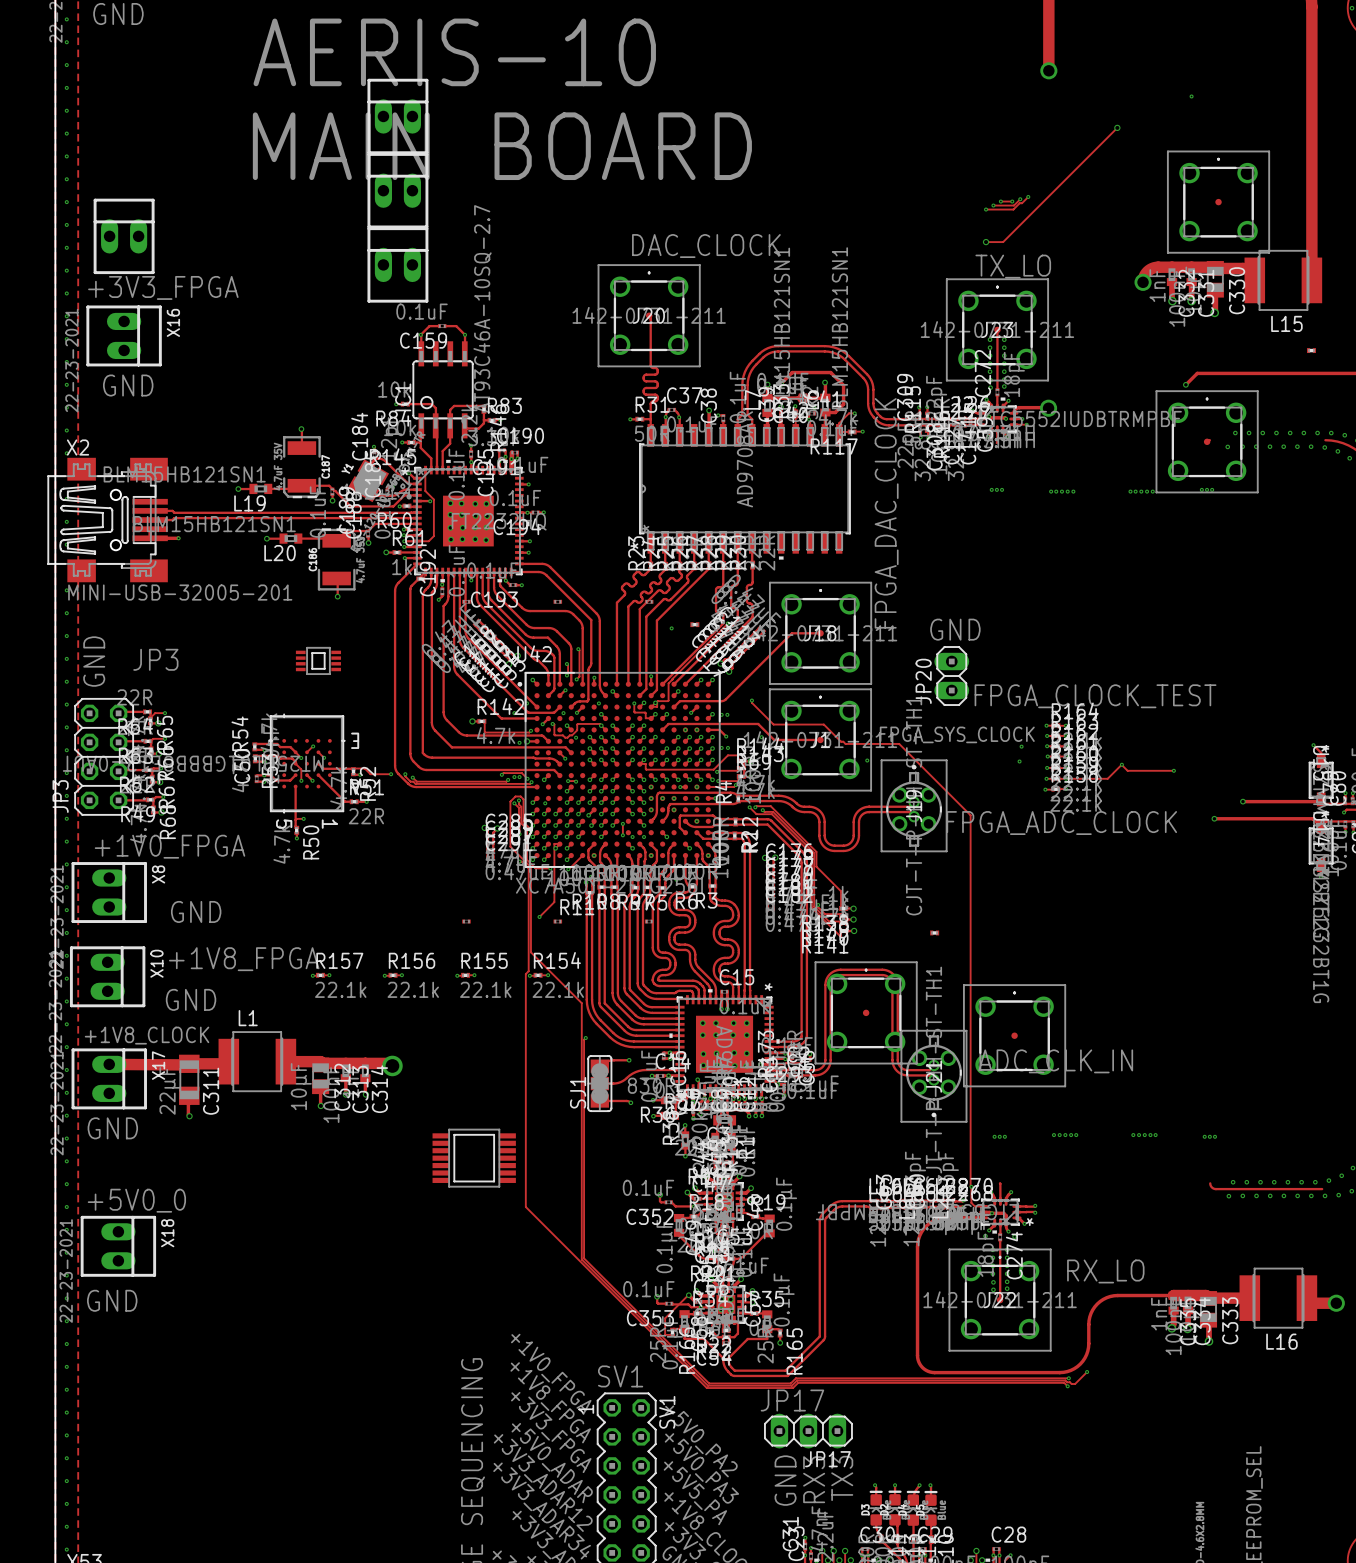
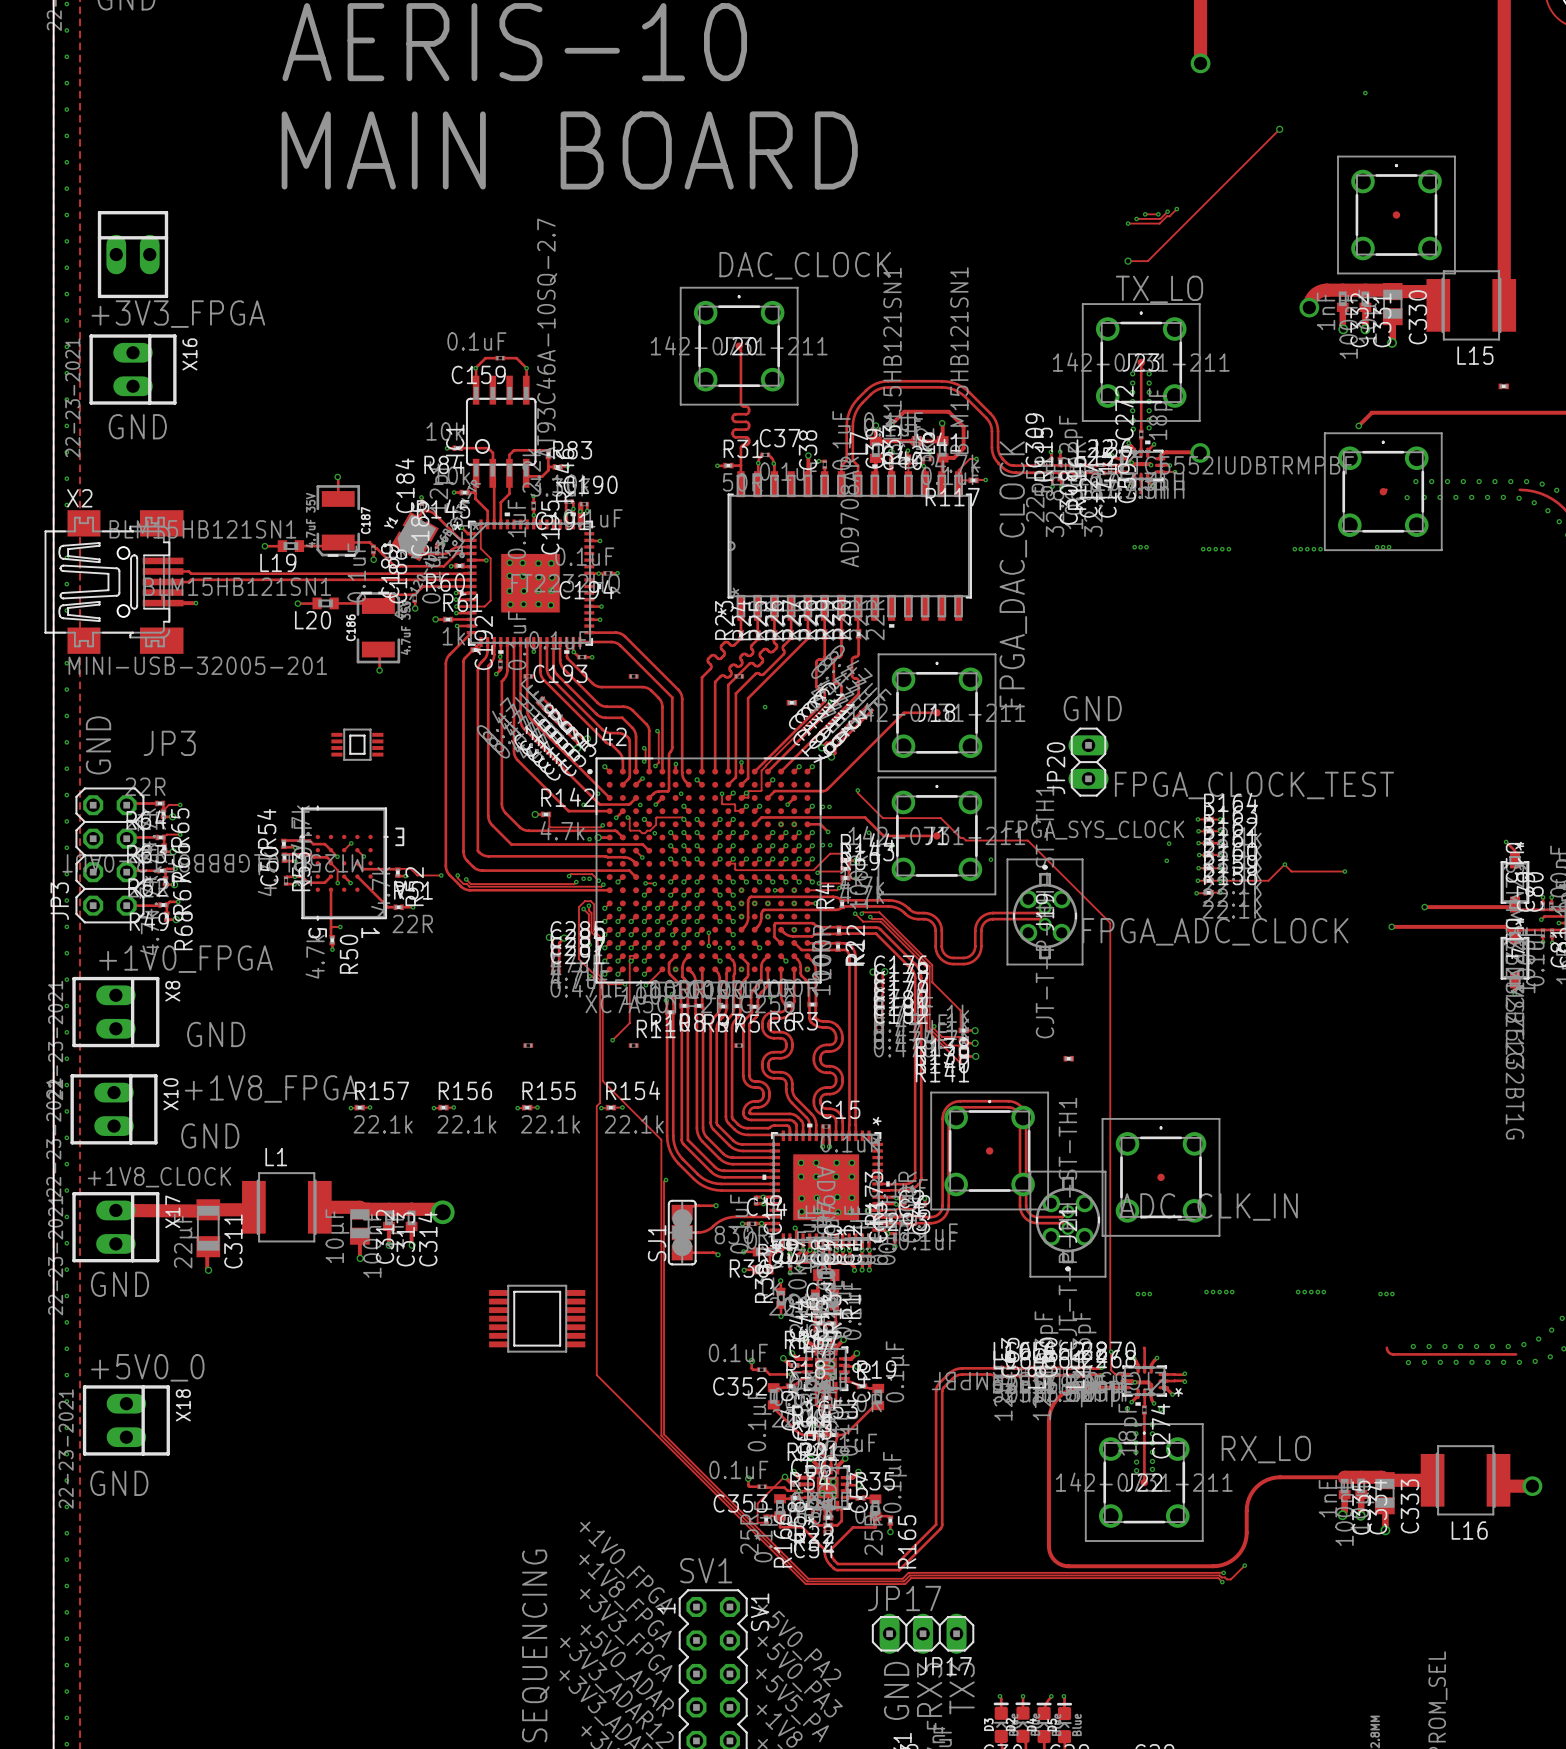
part: (397, 116) -> none
part: (397, 190) -> none
part: (397, 264) -> none

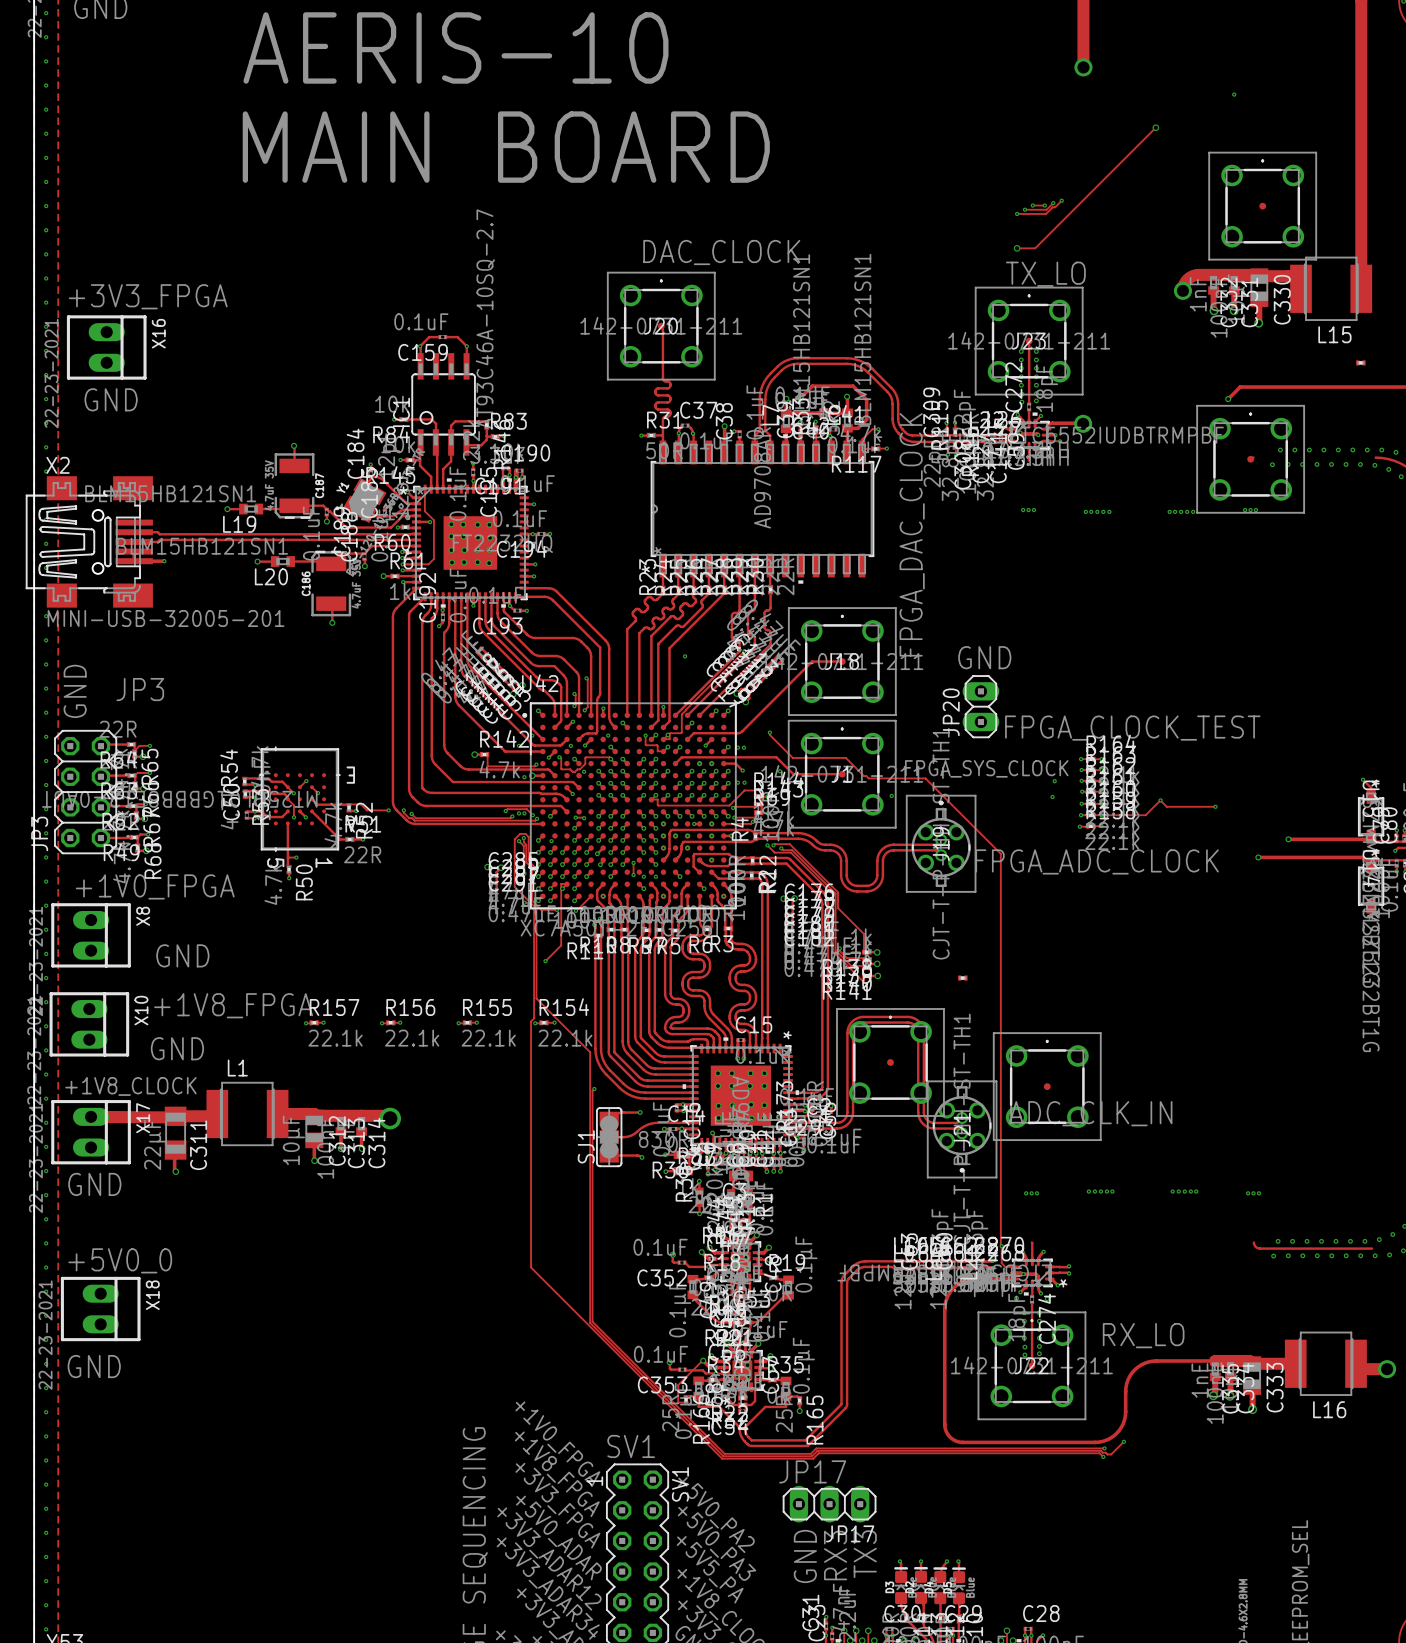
part: (133, 254) -> none
part: (475, 650) -> none
part: (528, 676) -> none
part: (633, 676) -> none
part: (739, 676) -> none
part: (791, 702) -> none
part: (357, 744) -> none
part: (528, 1045) -> none
part: (633, 1045) -> none
part: (739, 1045) -> none
part: (537, 1318) -> none

